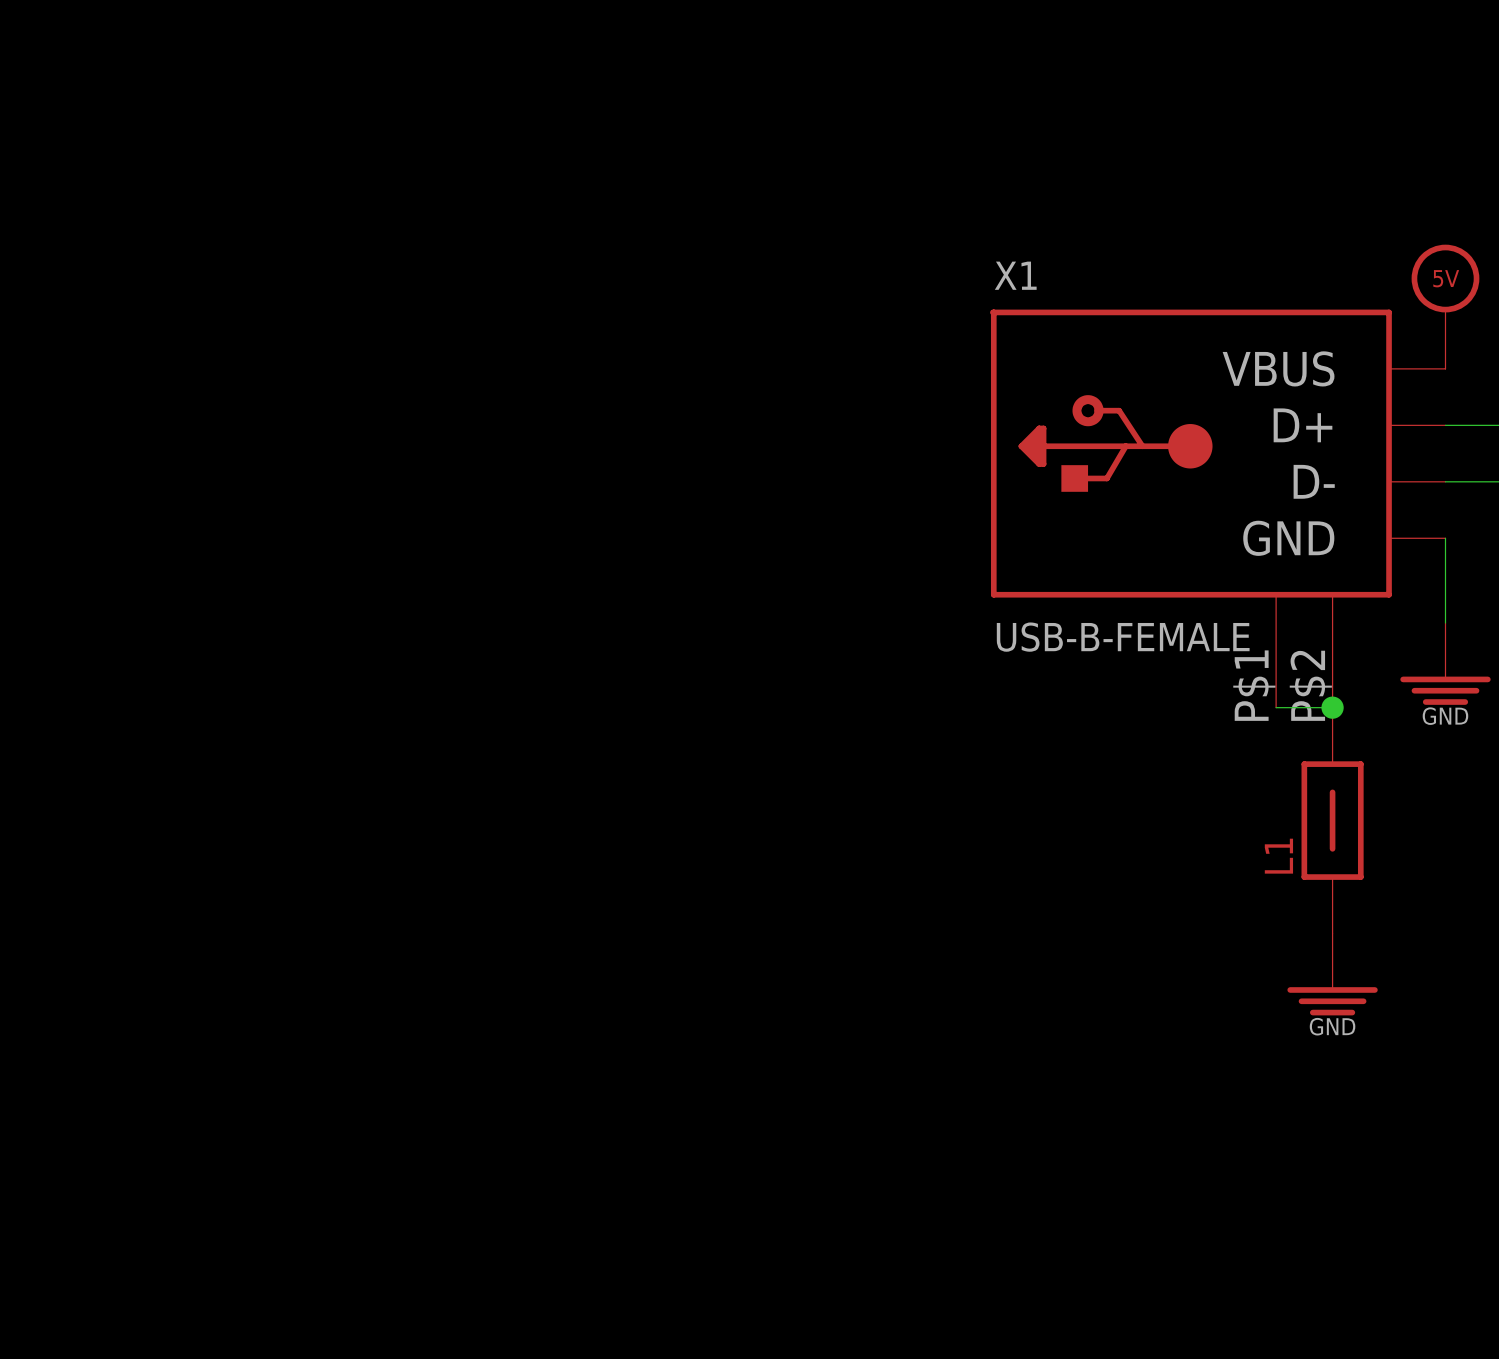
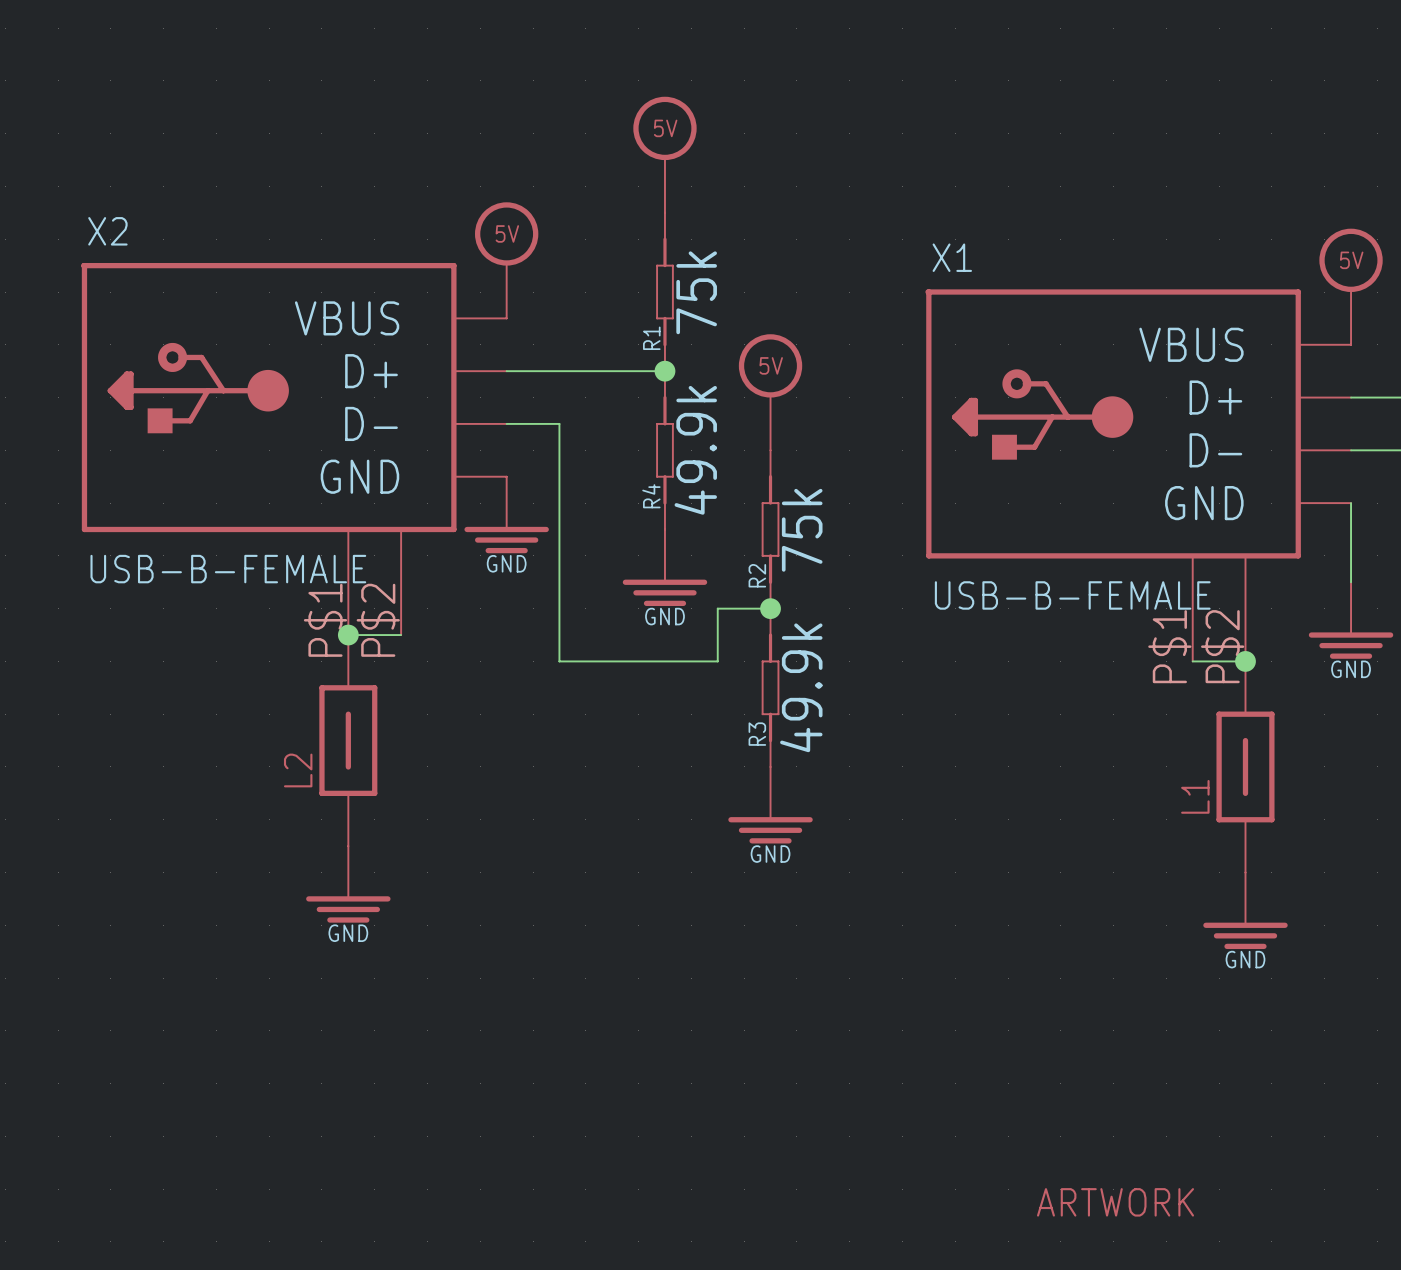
power symbol: none -> (664, 154)
power symbol: none -> (506, 260)
R1: none -> 75k (664, 292)
wire: none -> (506, 371) (664, 371)
junction: none -> (664, 371)
power symbol: none -> (770, 392)
wire: none -> (506, 423) (559, 423) (559, 661) (717, 661) (717, 608) (770, 608)
X2: none -> USB-B-FEMALE (293, 449)
R4: none -> 49.9k (664, 450)
power symbol: none -> GND (506, 514)
R2: none -> 75k (770, 529)
power symbol: none -> GND (664, 567)
junction: none -> (770, 608)
wire: none -> (348, 635) (401, 635)
junction: none -> (348, 635)
R3: none -> 49.9k (770, 687)
L2: none -> (348, 740)
power symbol: none -> GND (770, 805)
power symbol: none -> GND (348, 884)
part: none -> (1115, 1202)

